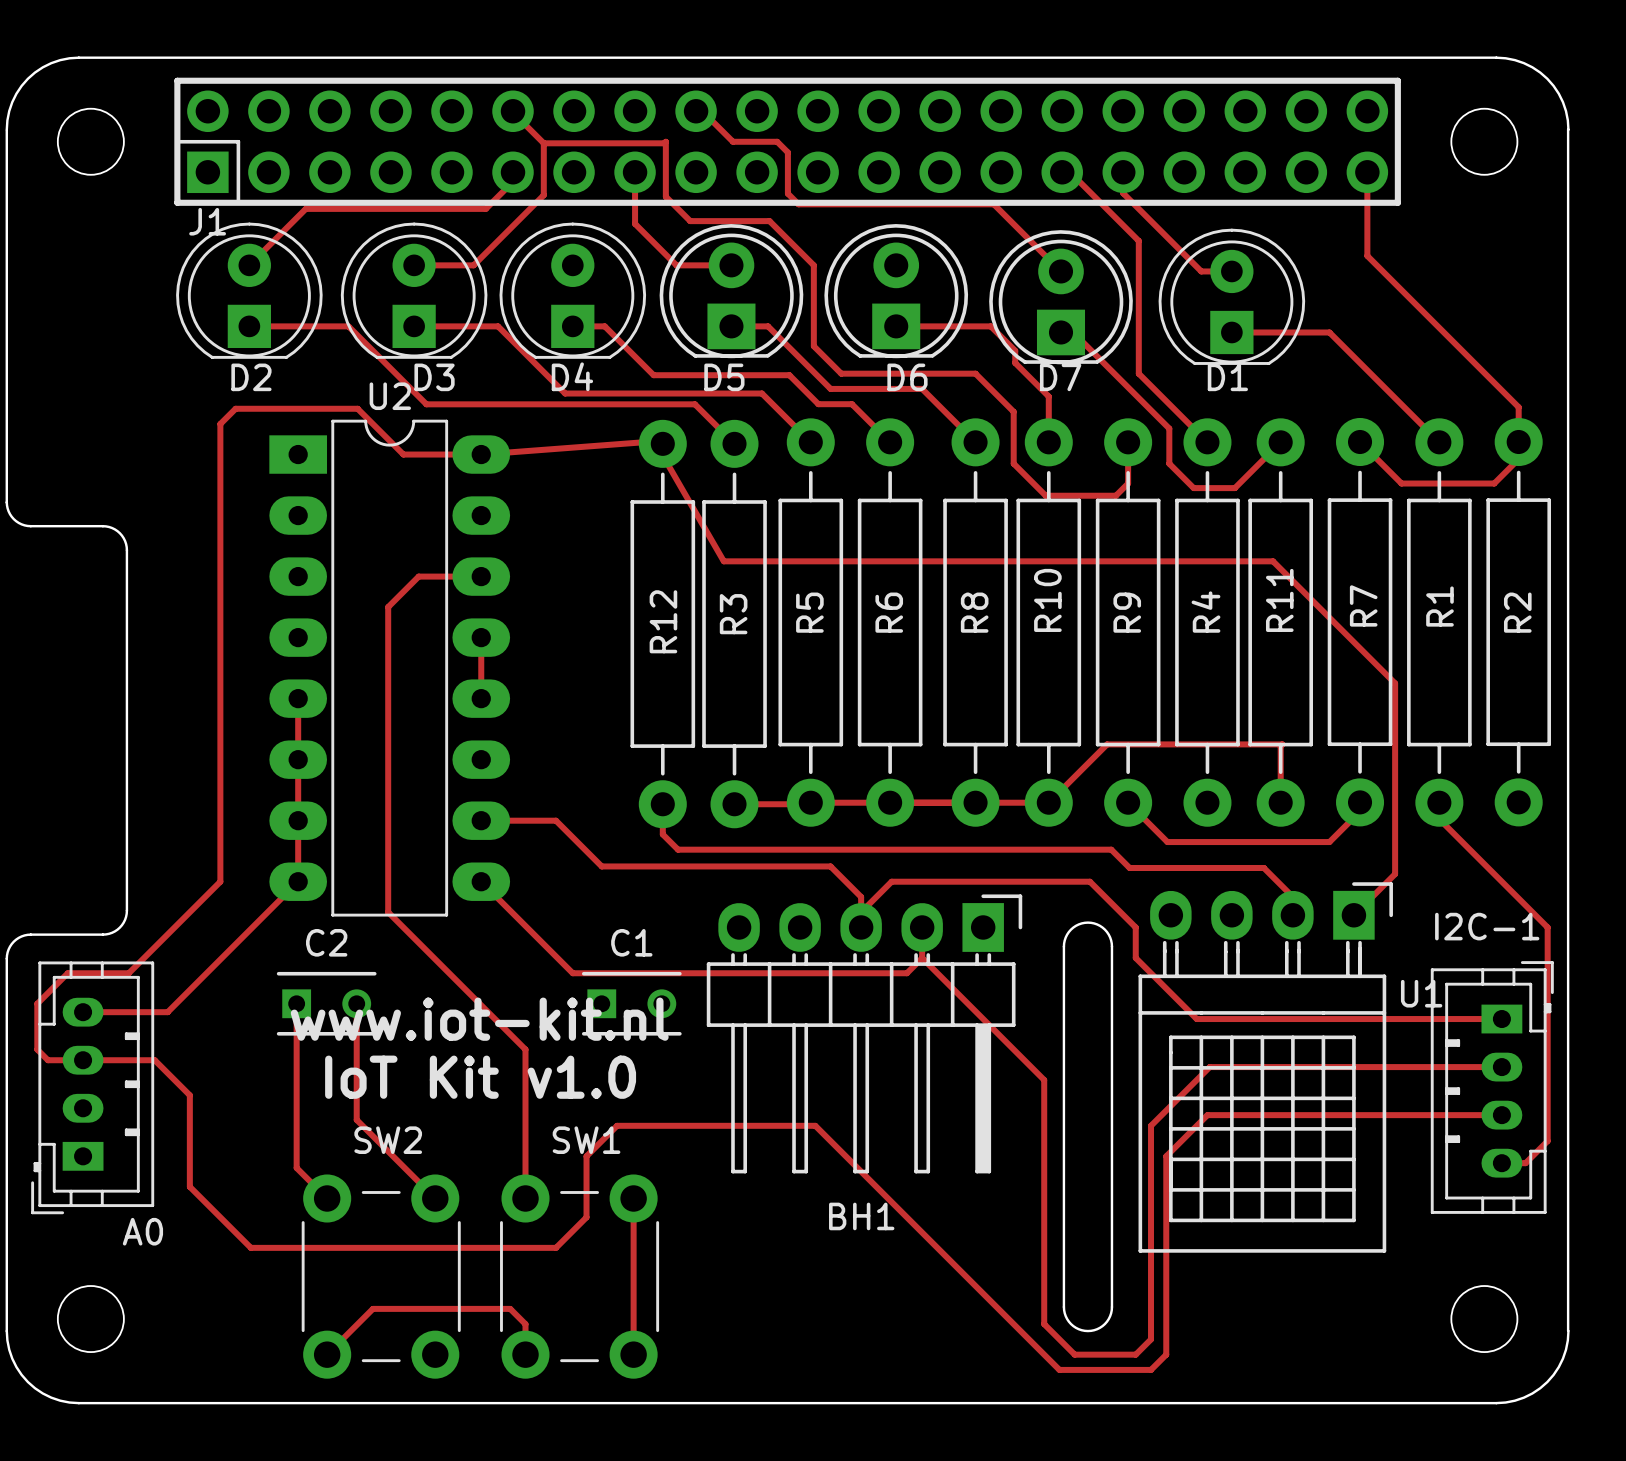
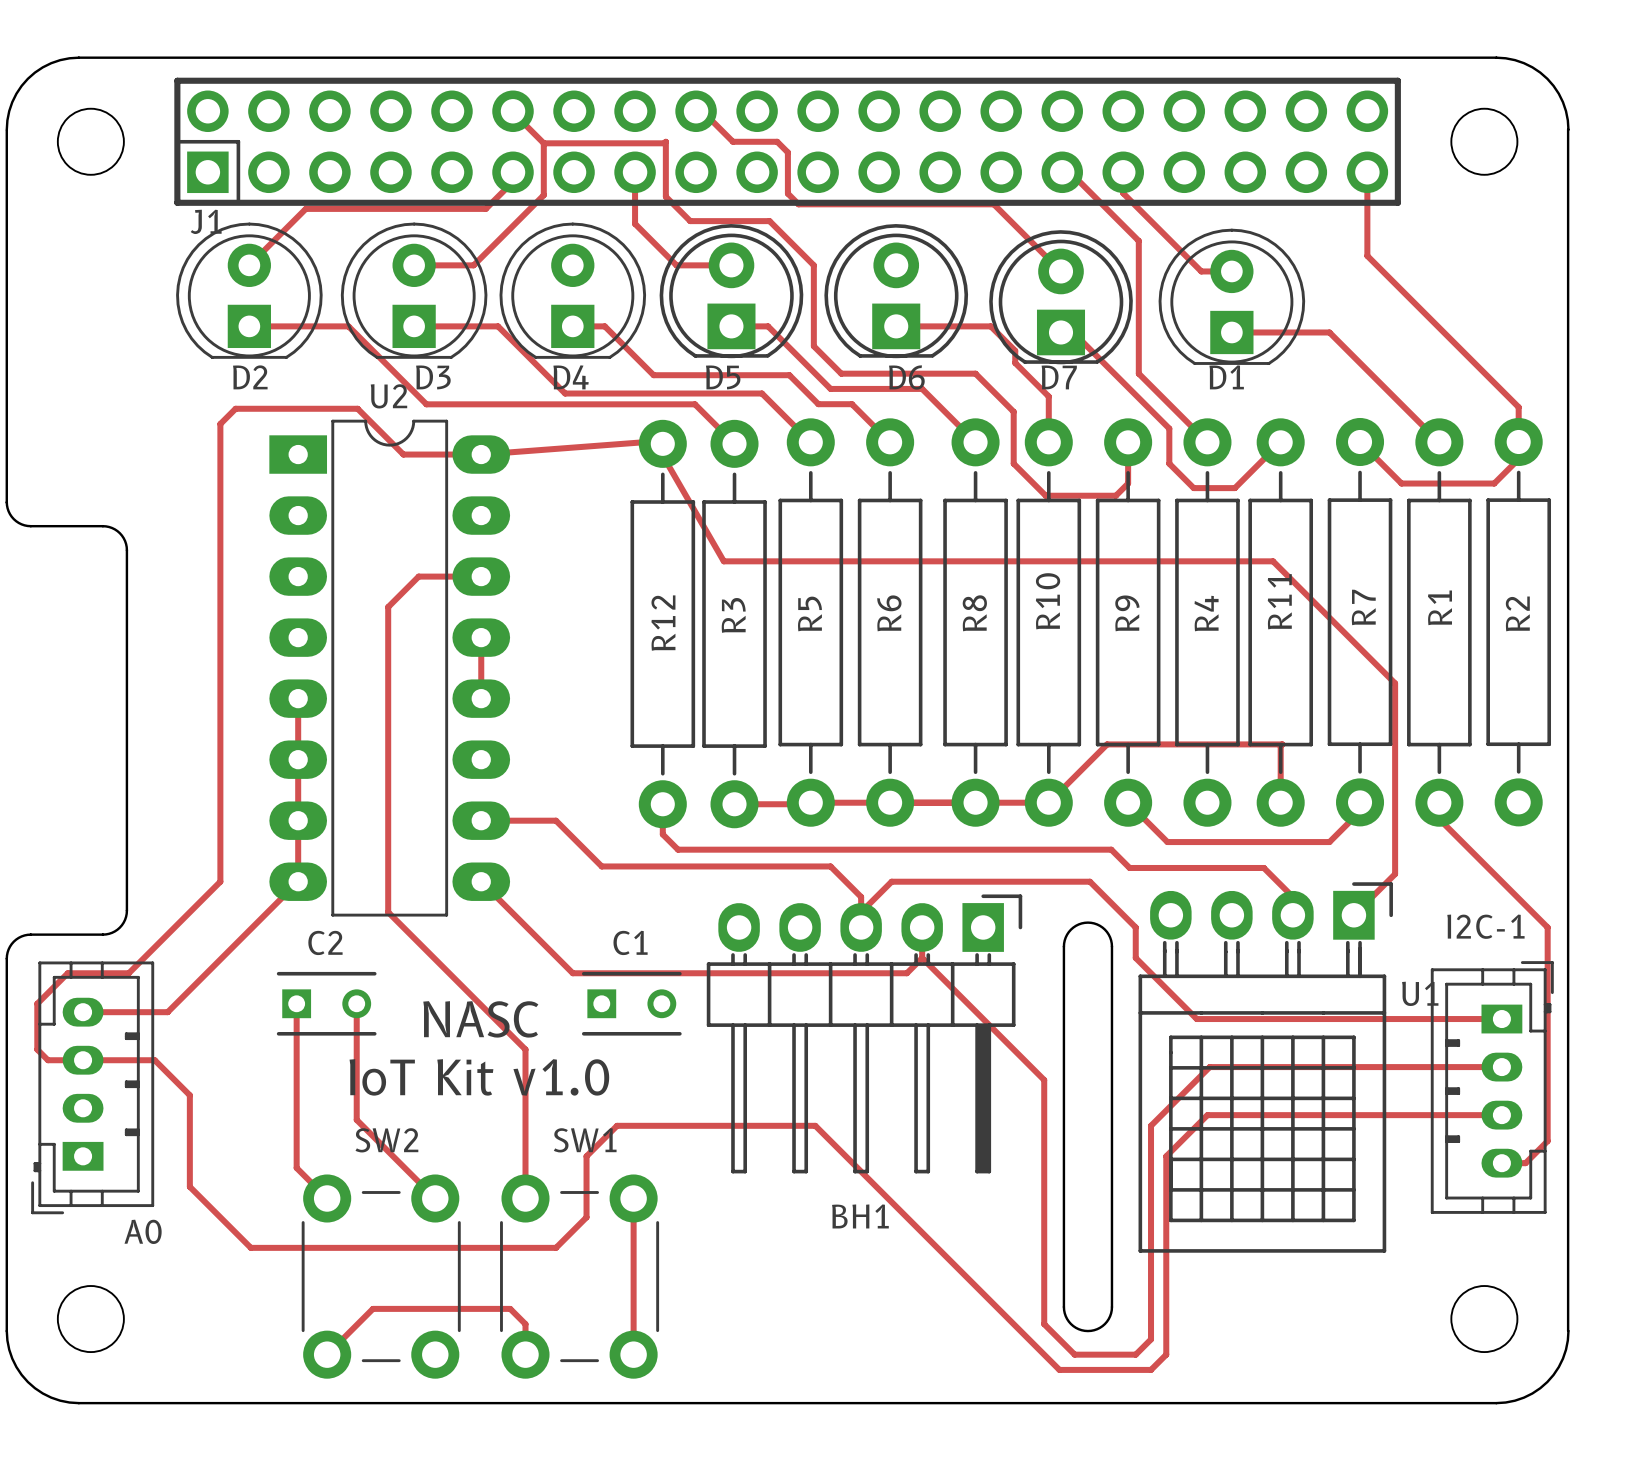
text: www.iot-kit.nl (479, 1019) -> NASC (480, 1019)

